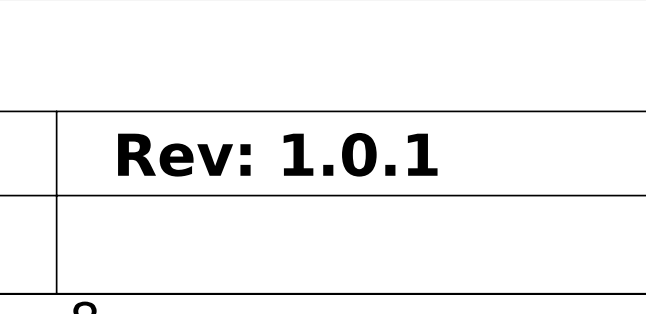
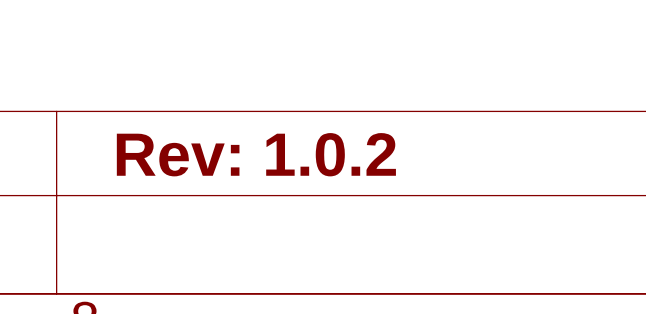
title block: Rev: 1.0.1 (277, 154) -> Rev: 1.0.2 (256, 154)

